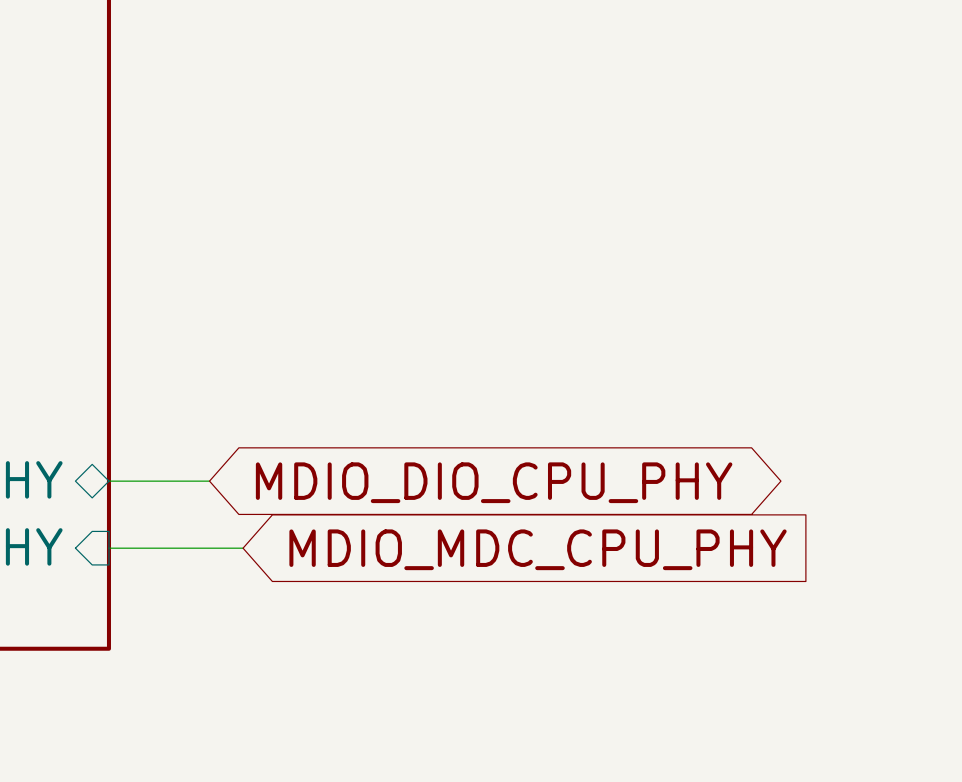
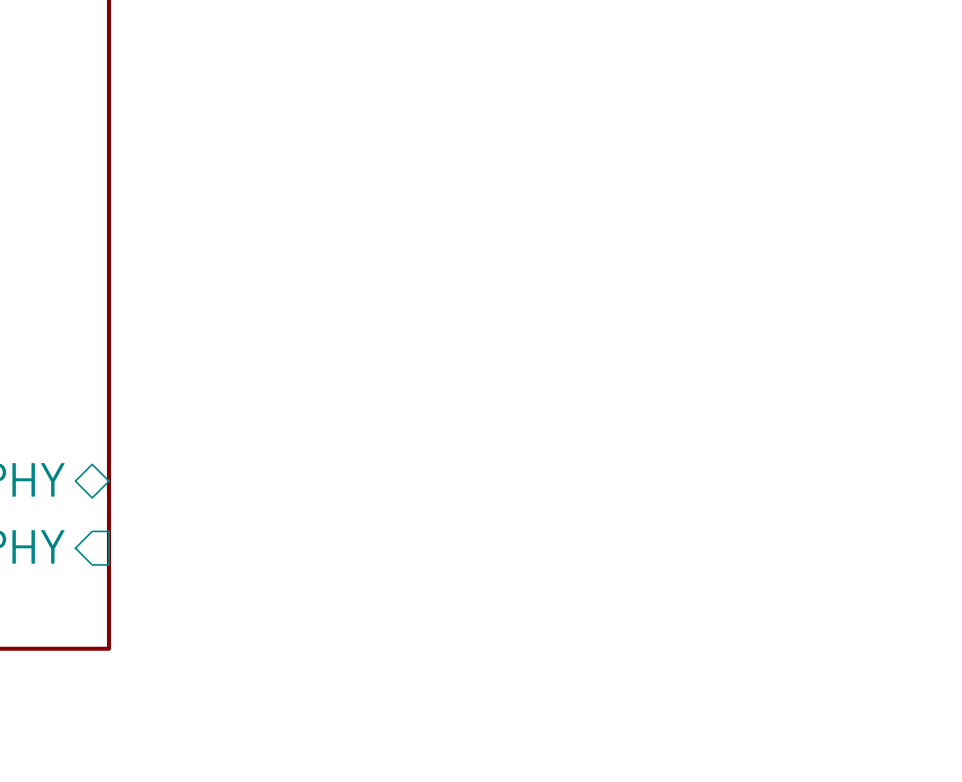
wire: (108, 481) (209, 481) -> none
global label: MDIO_DIO_CPU_PHY (494, 482) -> none
wire: (108, 548) (243, 548) -> none
global label: MDIO_MDC_CPU_PHY (538, 549) -> none

